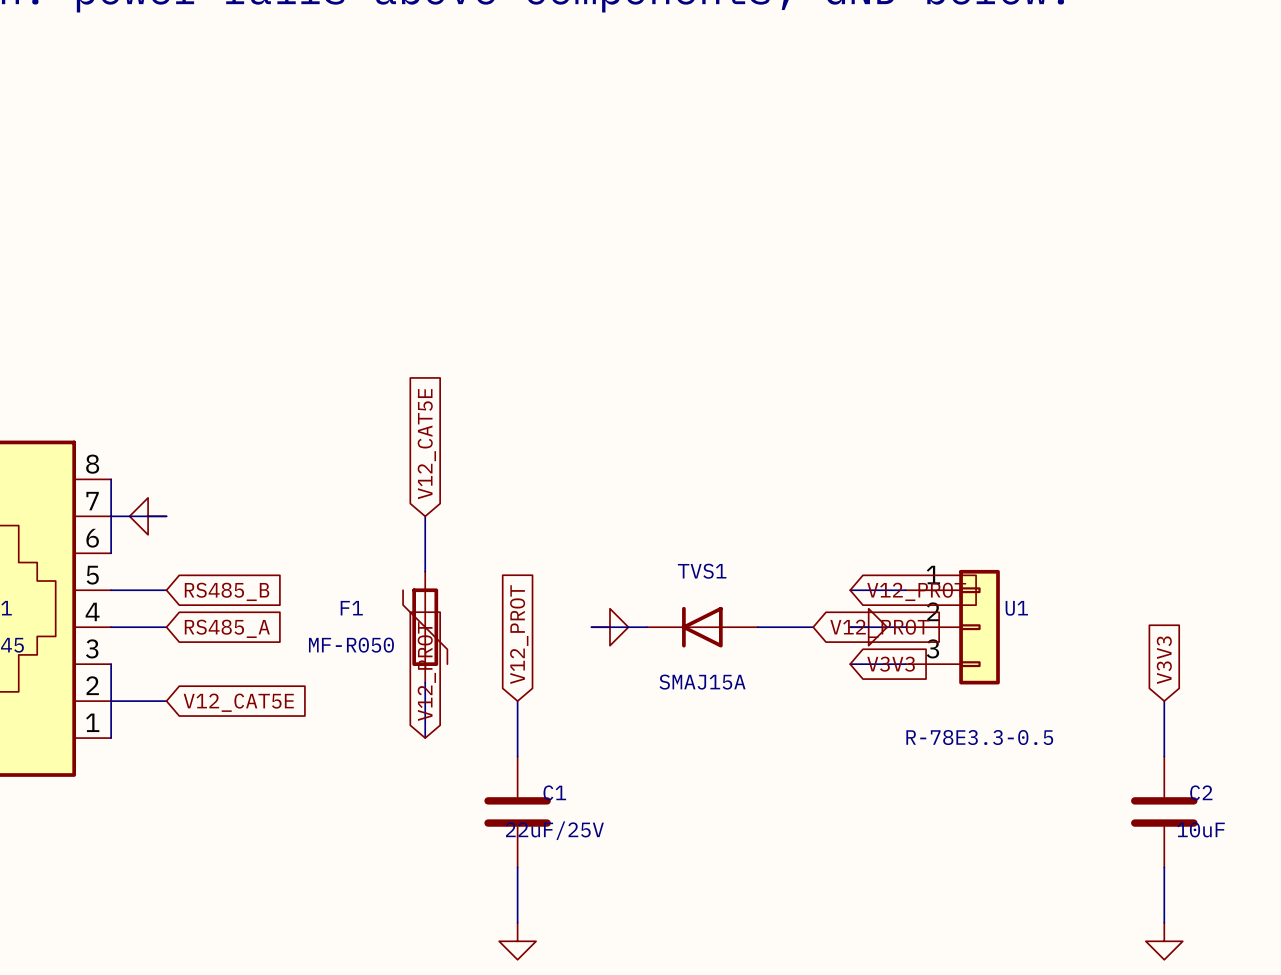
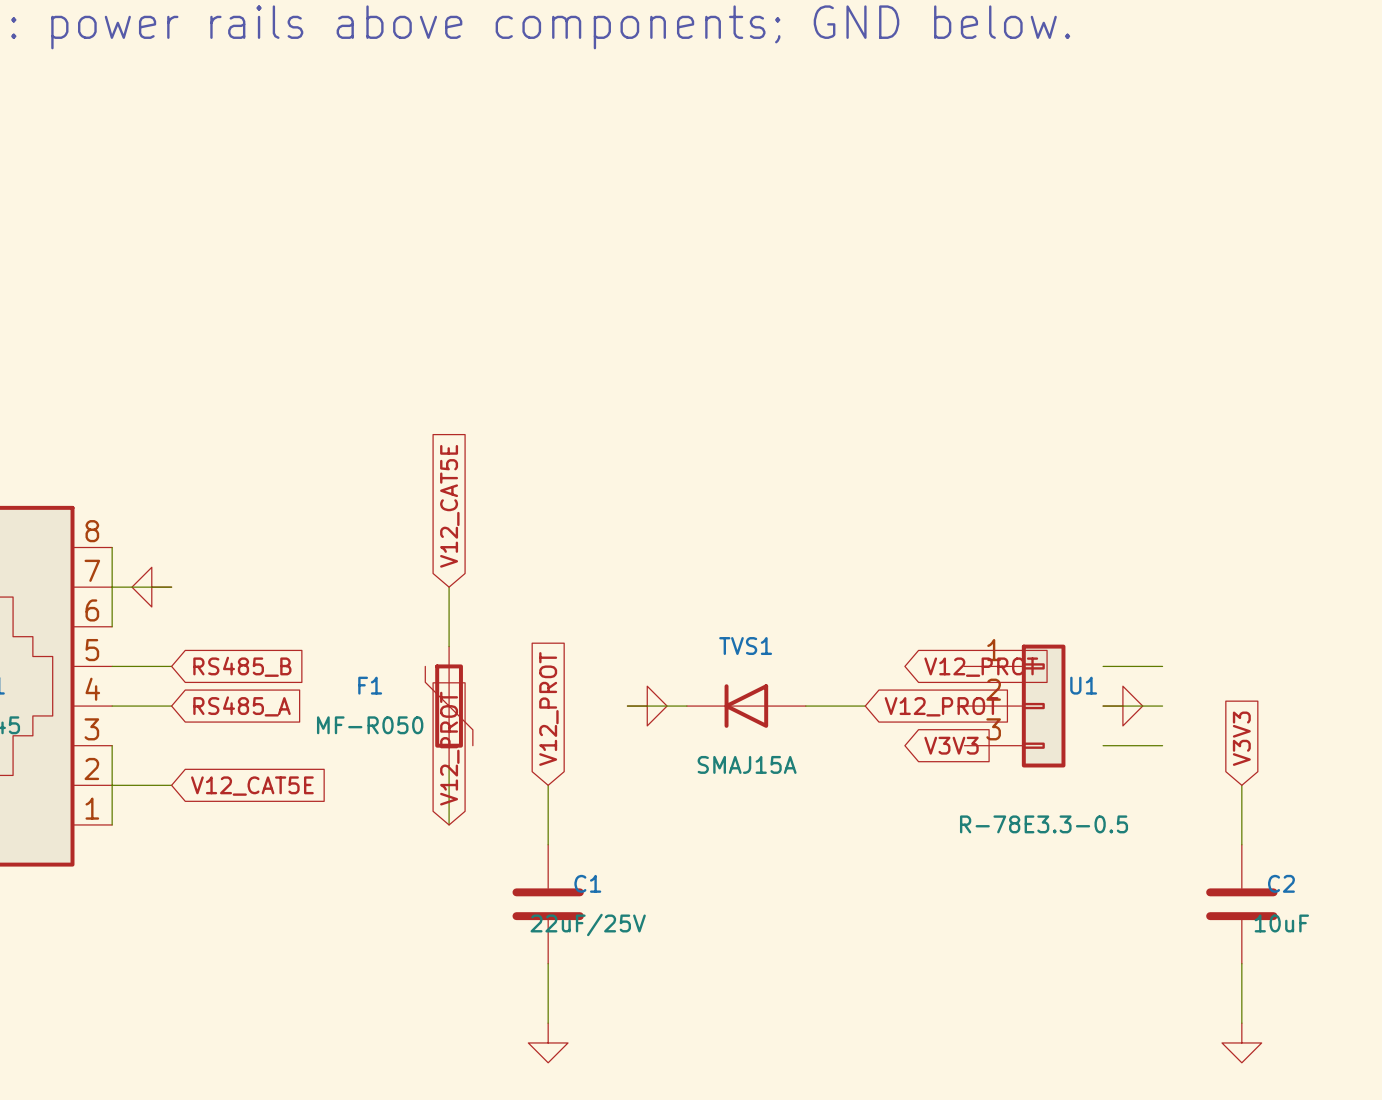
wire: (850, 590) (905, 590) -> (1103, 666) (1162, 666)
wire: (850, 627) (905, 627) -> (1103, 706) (1162, 706)
power symbol position: (868, 627) -> (1122, 706)
wire: (850, 664) (905, 664) -> (1103, 745) (1162, 745)

